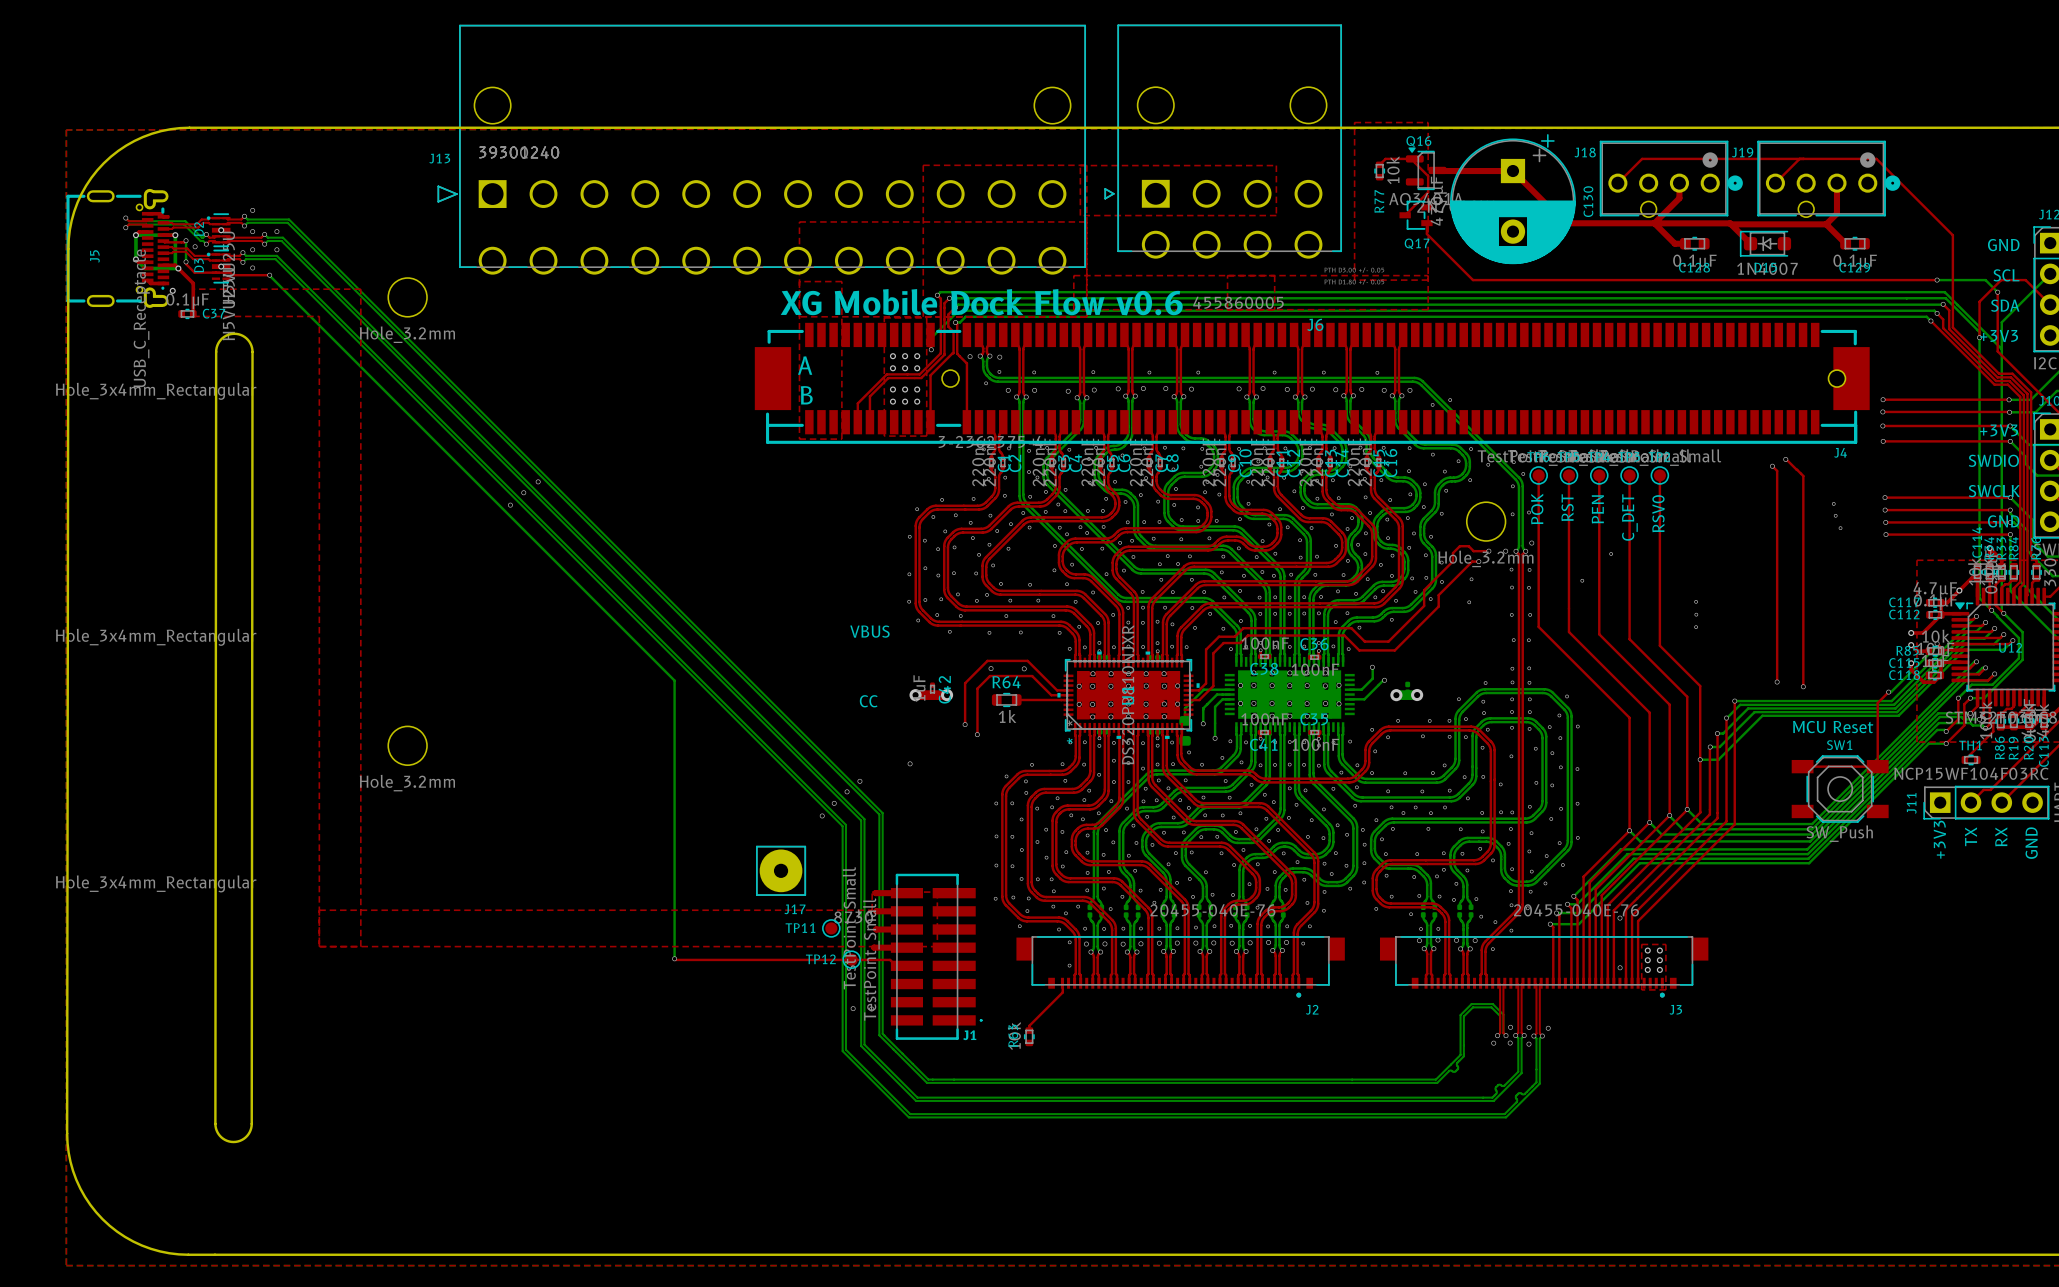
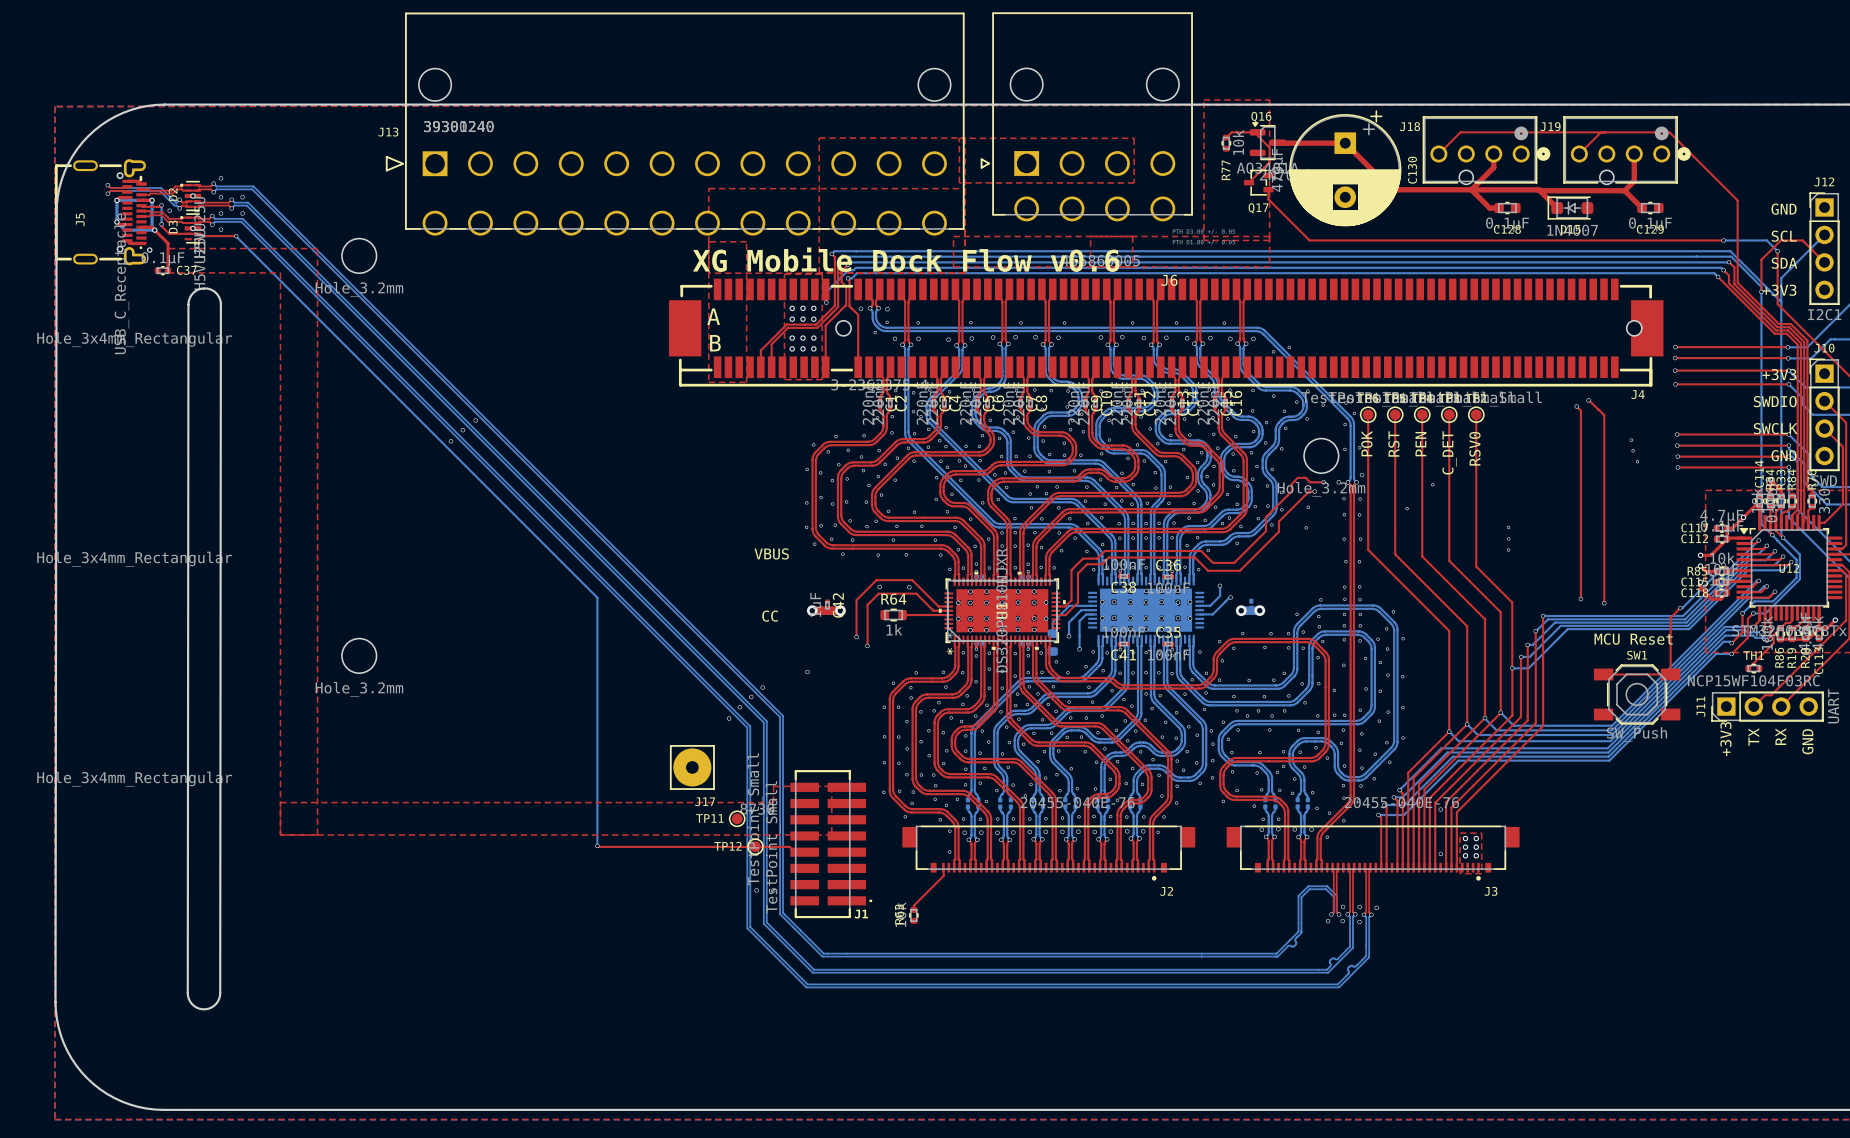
top track: (875, 893) (906, 893) -> none
top track: (876, 911) (906, 911) -> none
top track: (876, 929) (906, 929) -> none
top track: (873, 947) (906, 947) -> none

